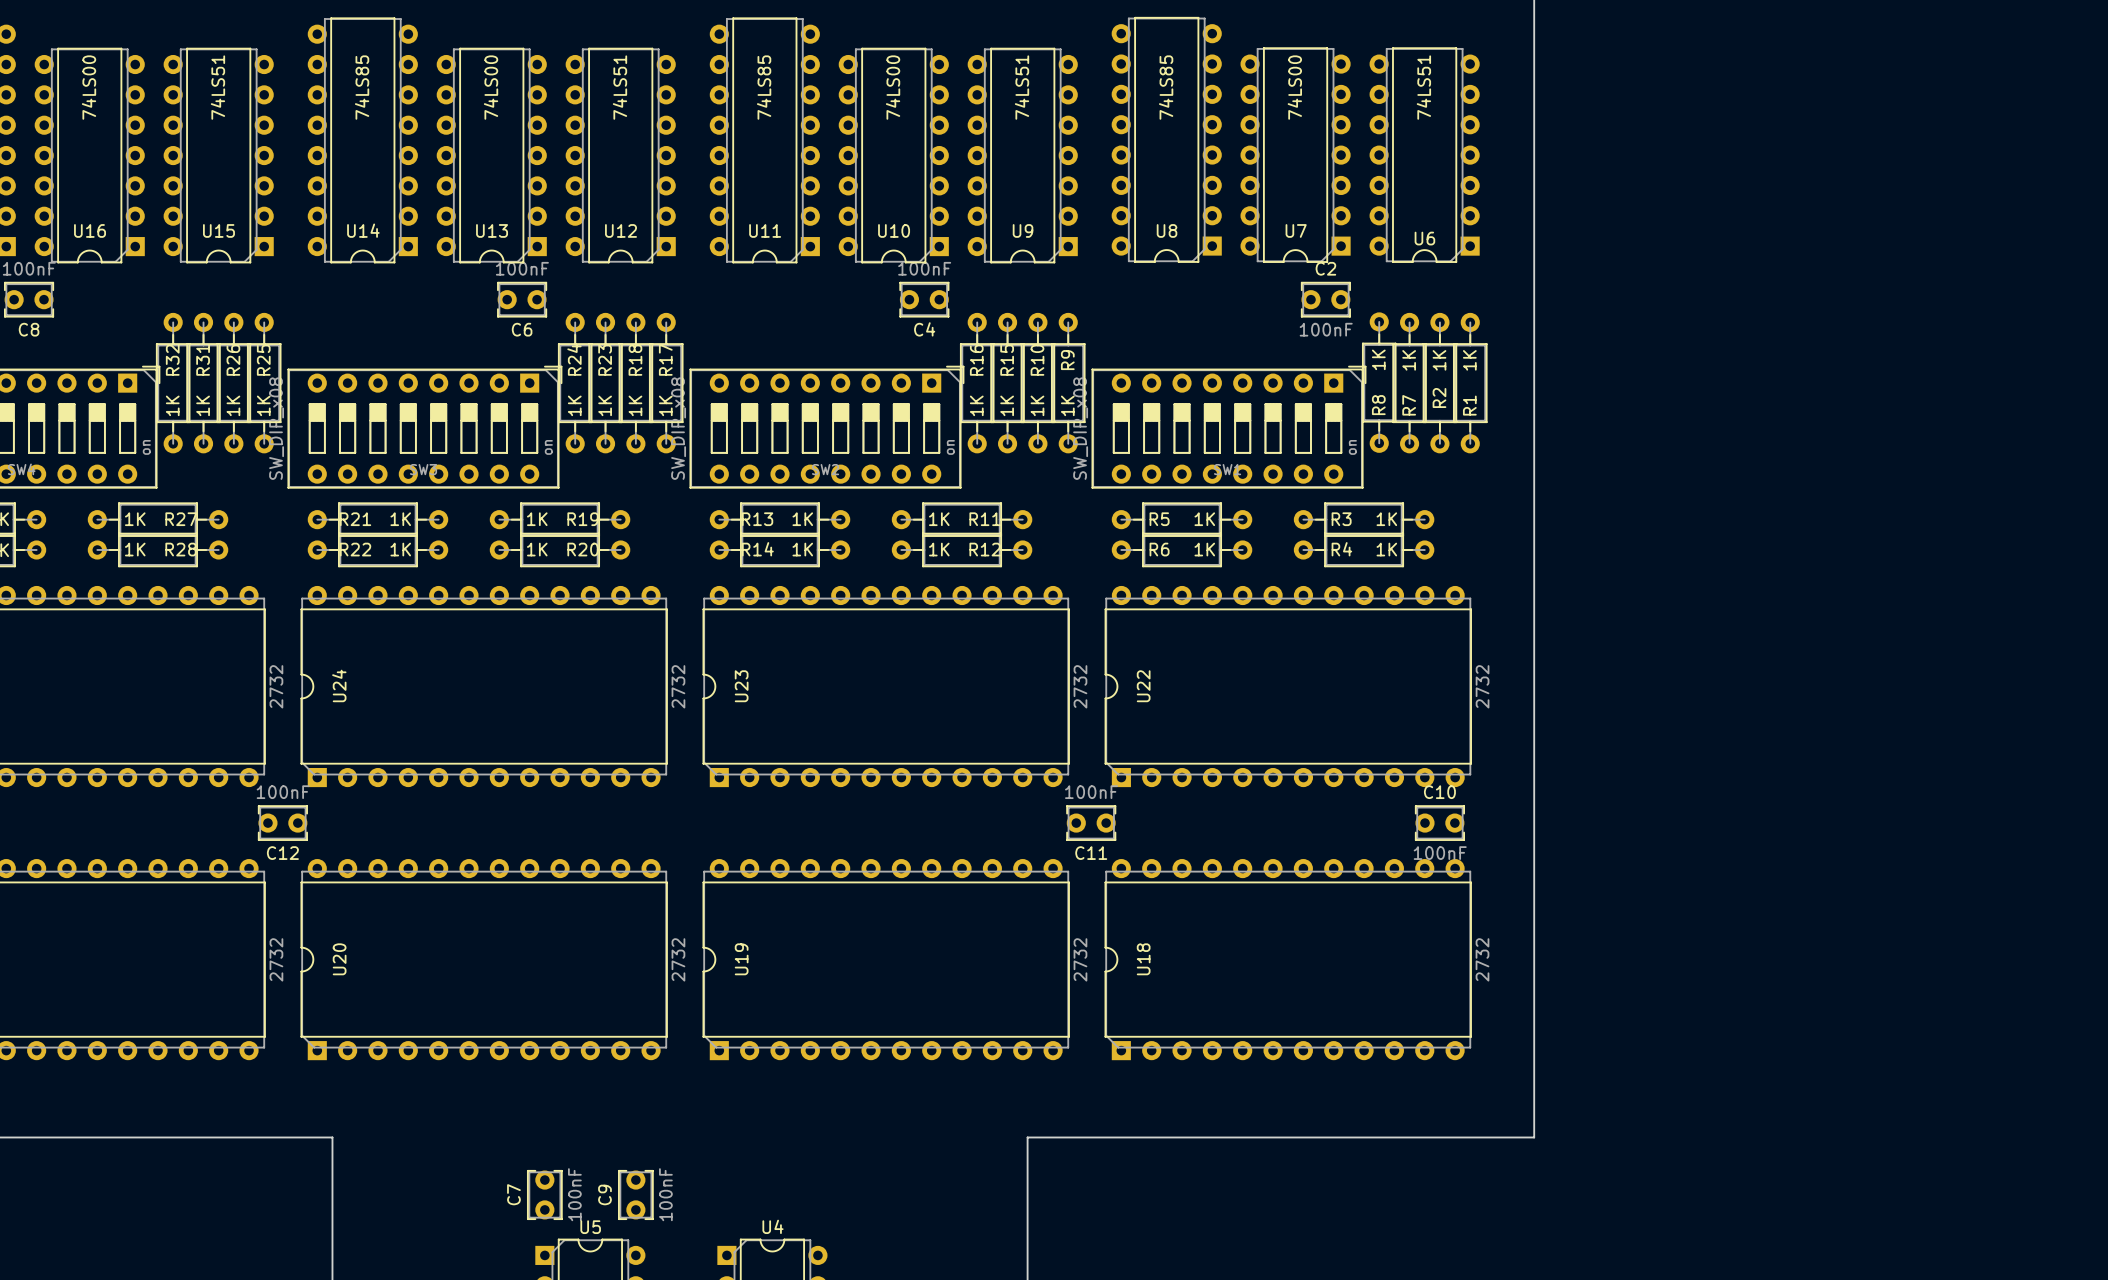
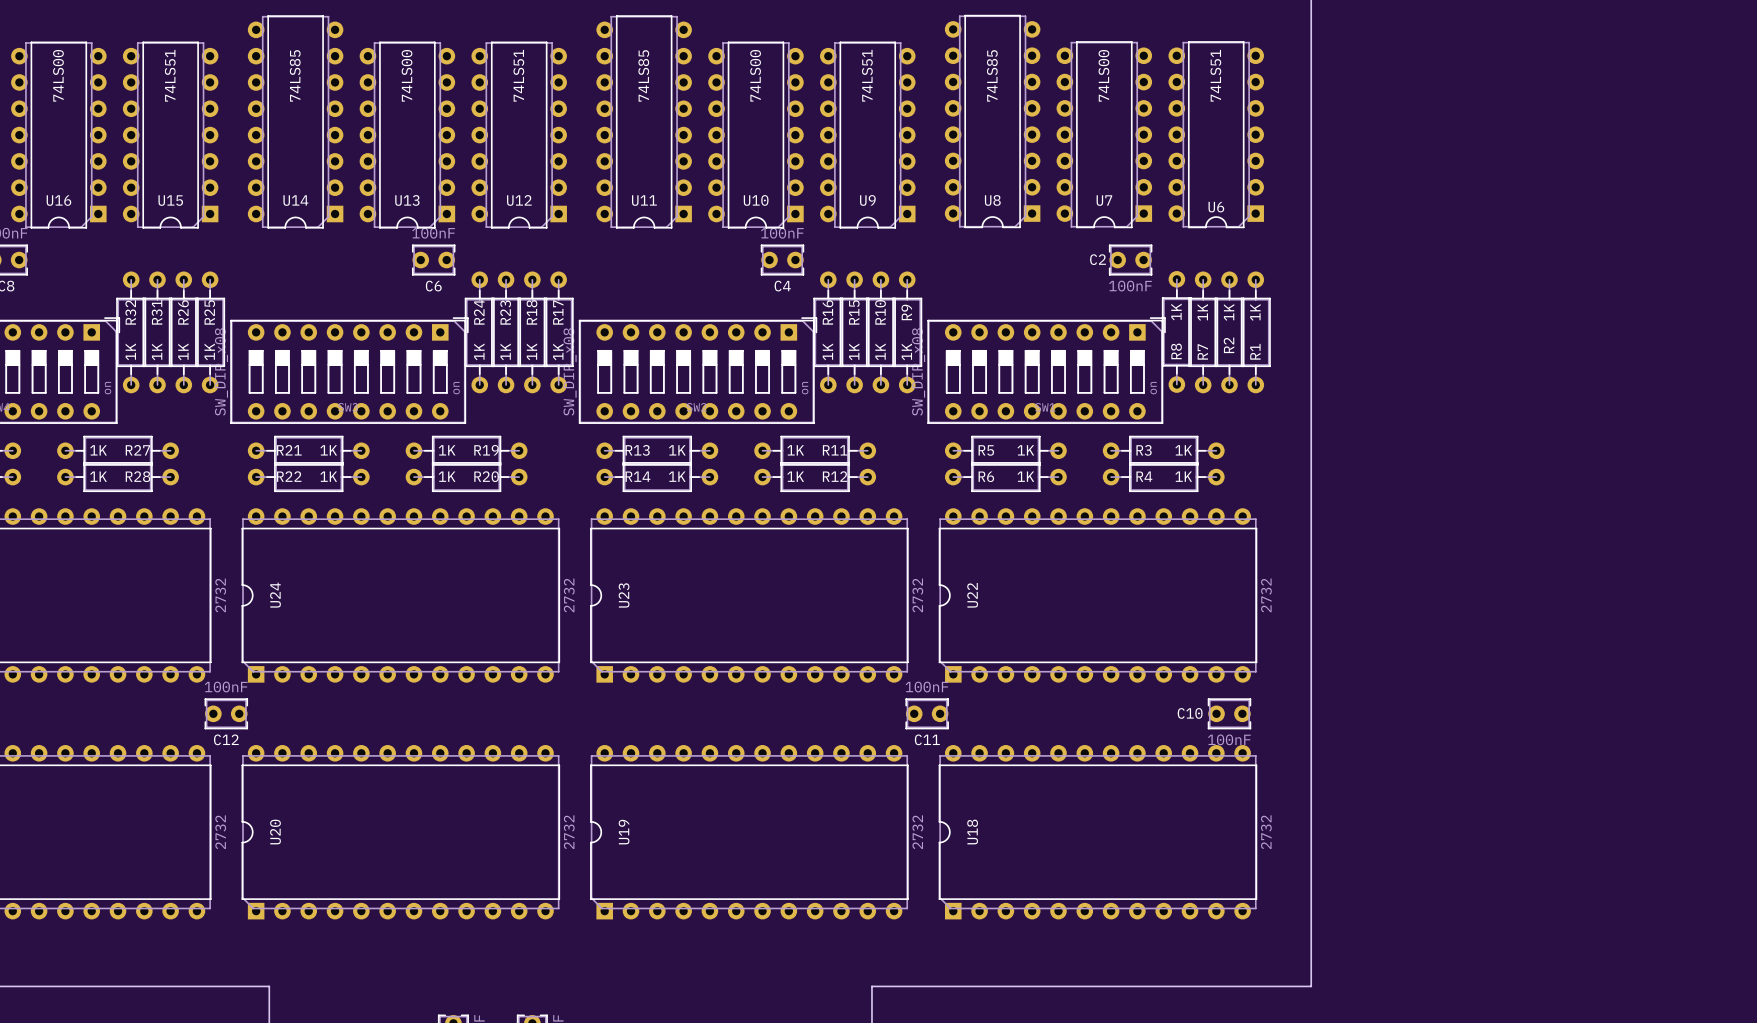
C2 name position: C2 (1325, 268) -> C2 (1098, 259)
C10 name position: C10 (1439, 792) -> C10 (1190, 713)

